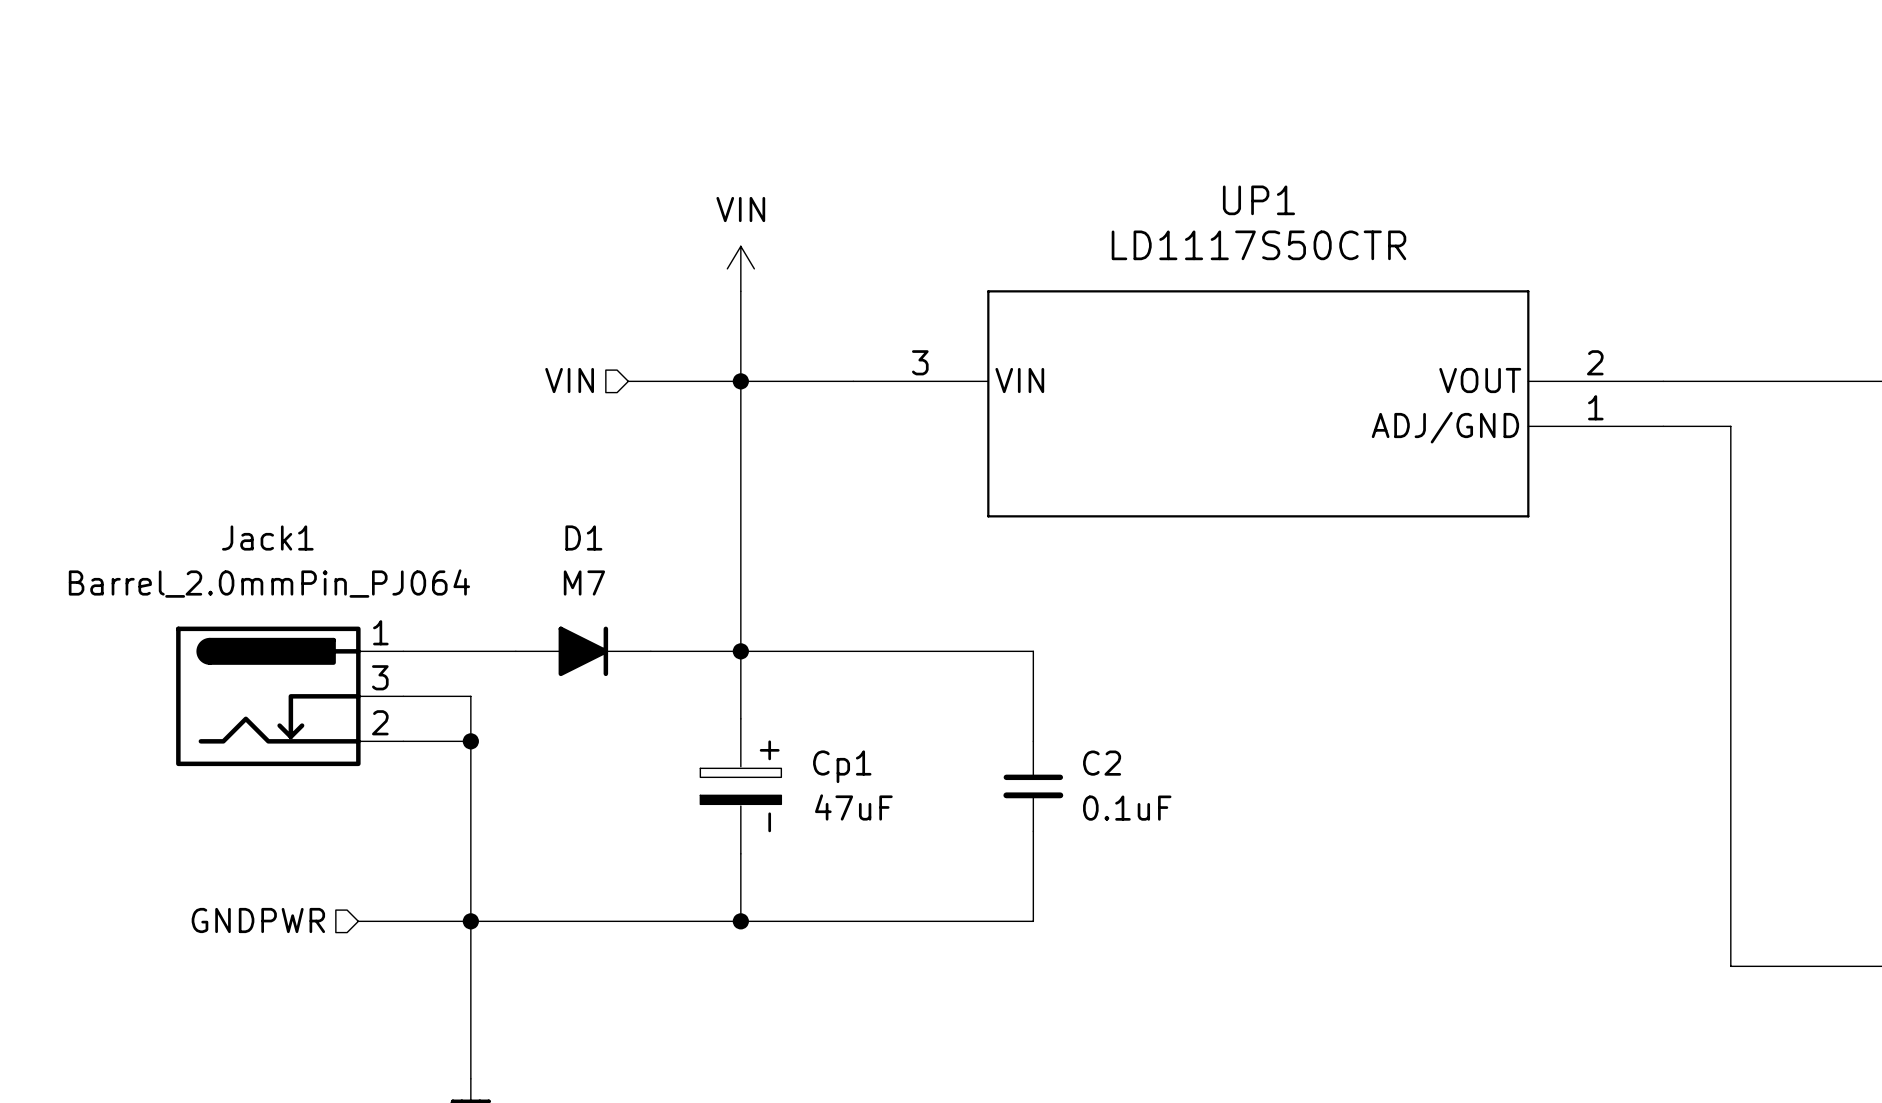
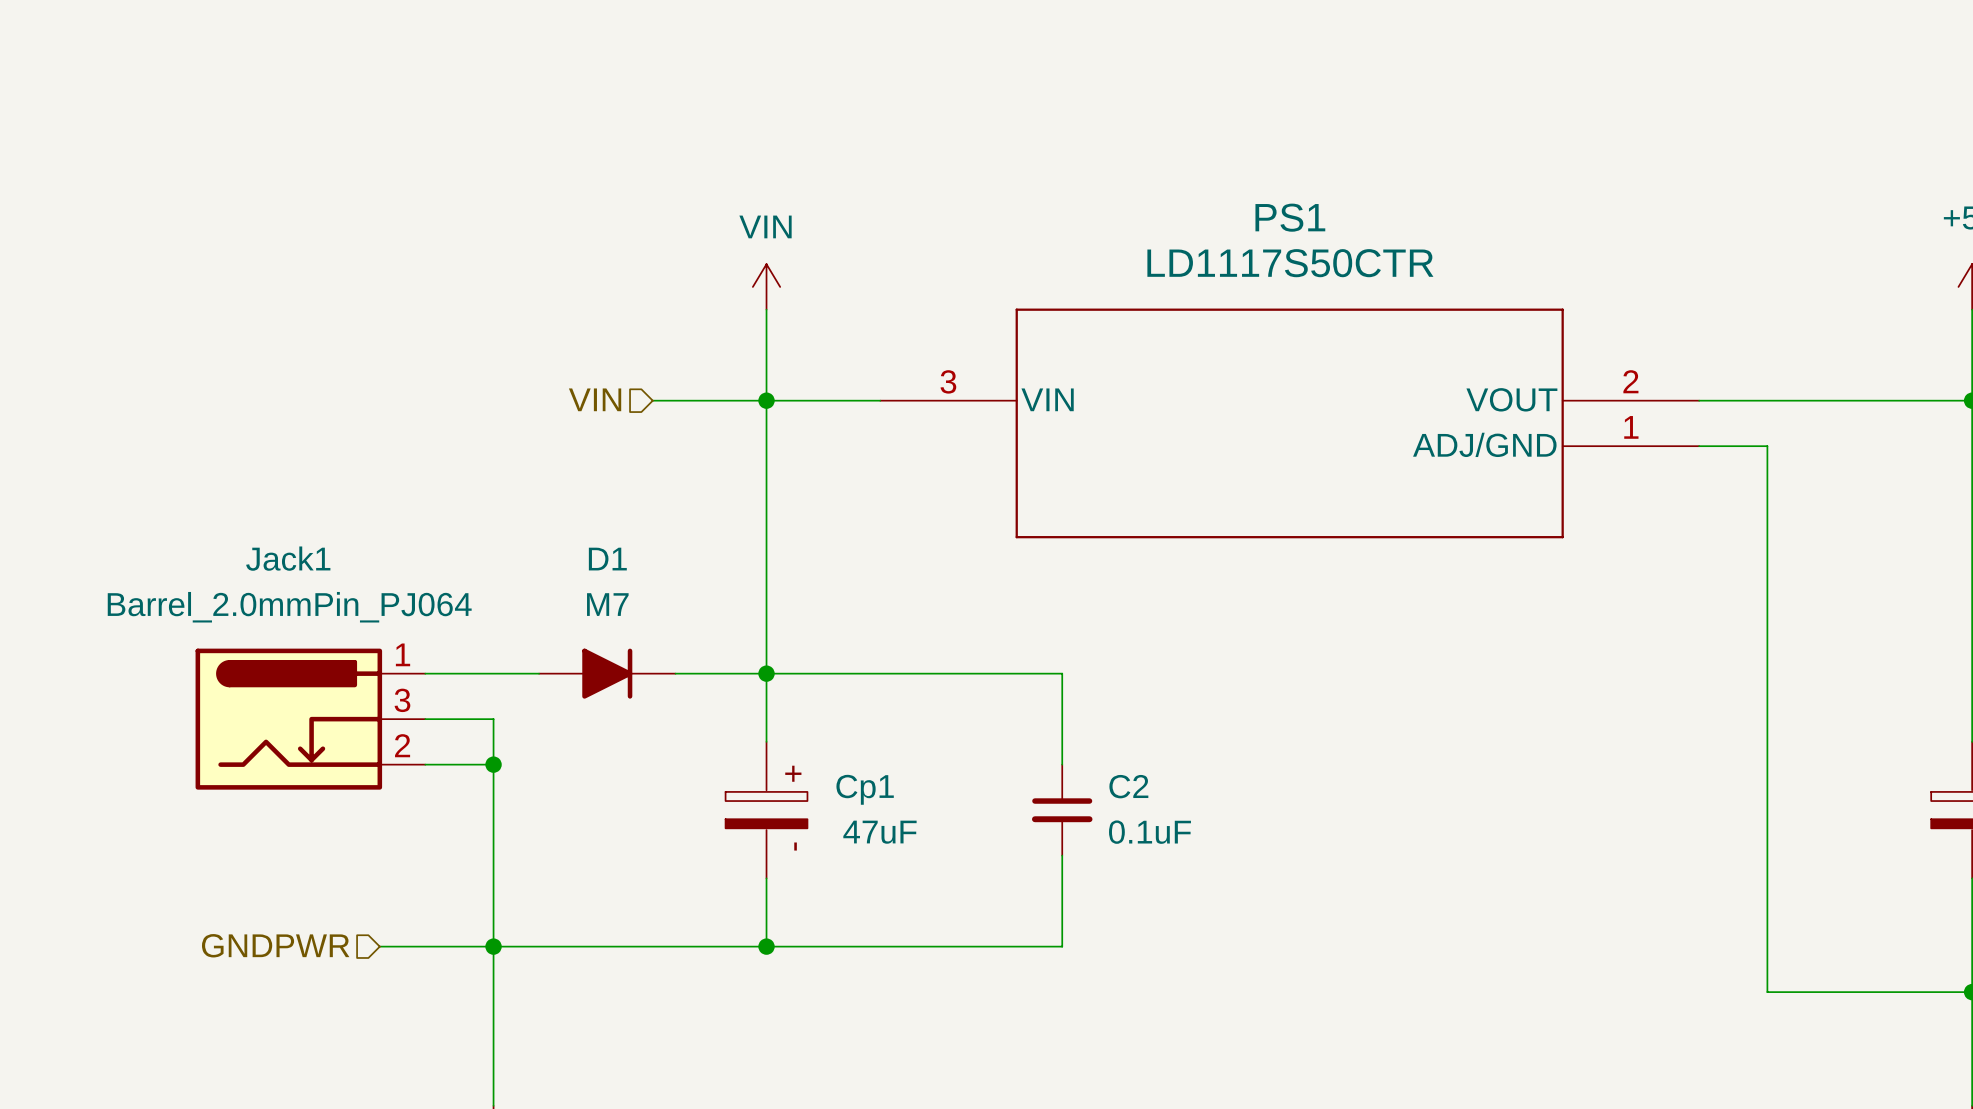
UP1 name: UP1 (1258, 200) -> PS1 (1290, 217)

